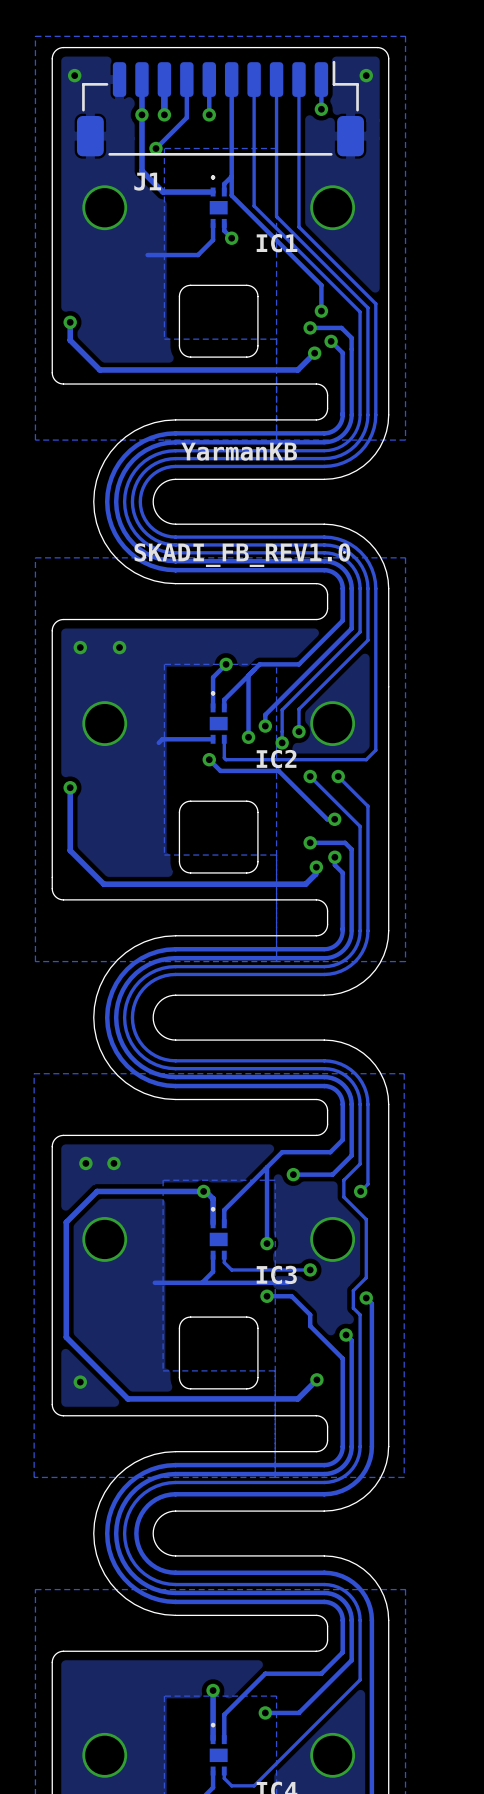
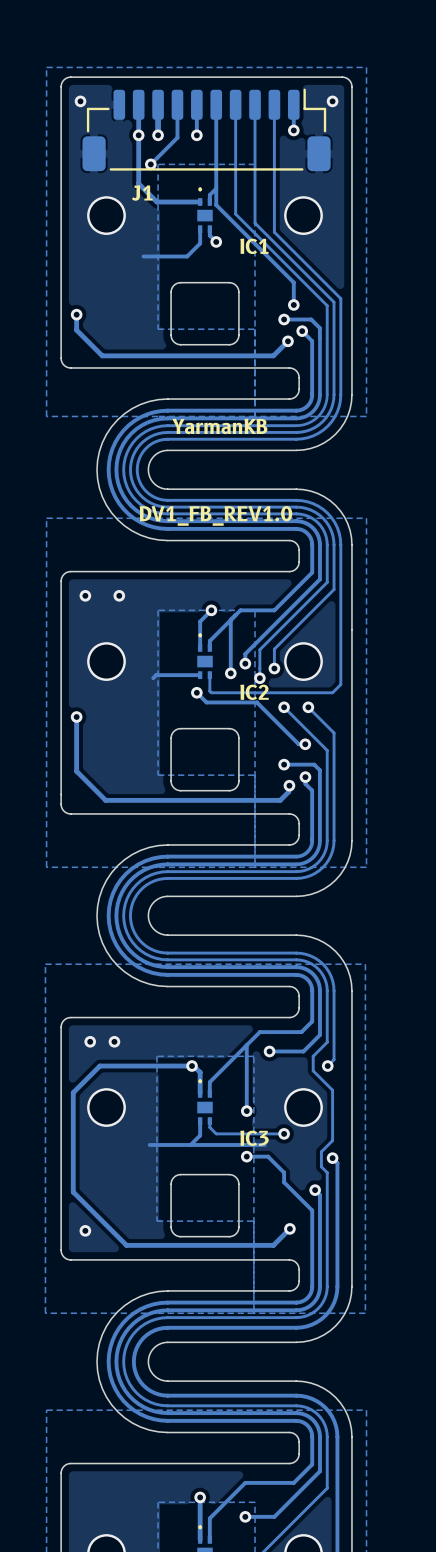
text: SKADI_FB_REV1.0 (242, 555) -> DV1_FB_REV1.0 (215, 515)

